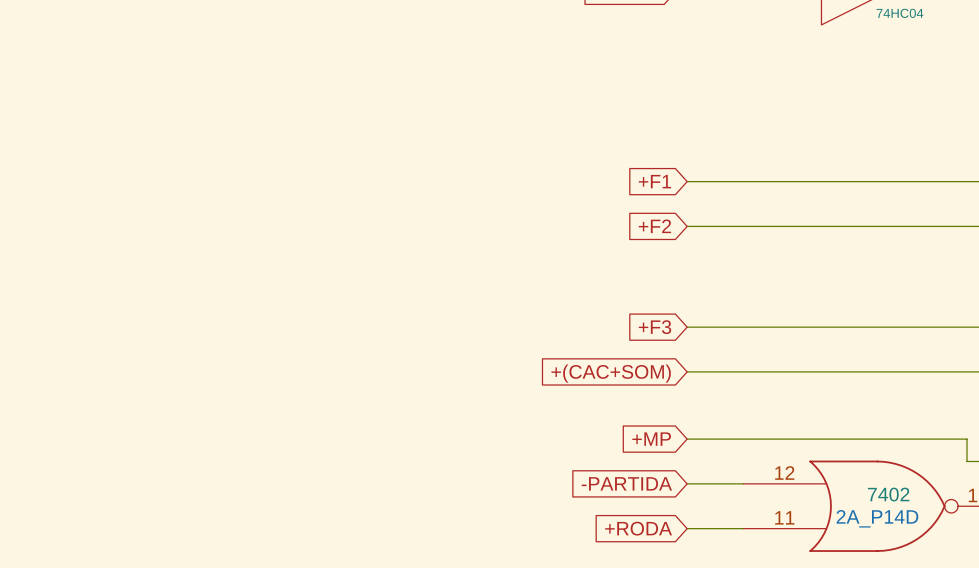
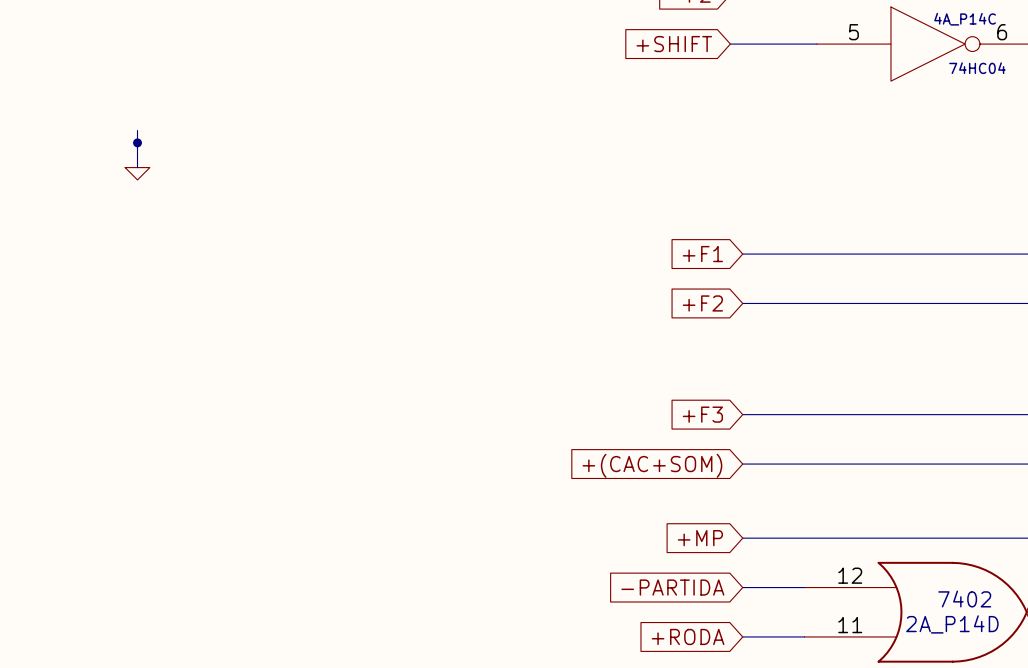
wire: none -> (137, 130) (137, 167)
junction: none -> (137, 142)
power symbol: none -> (137, 173)

